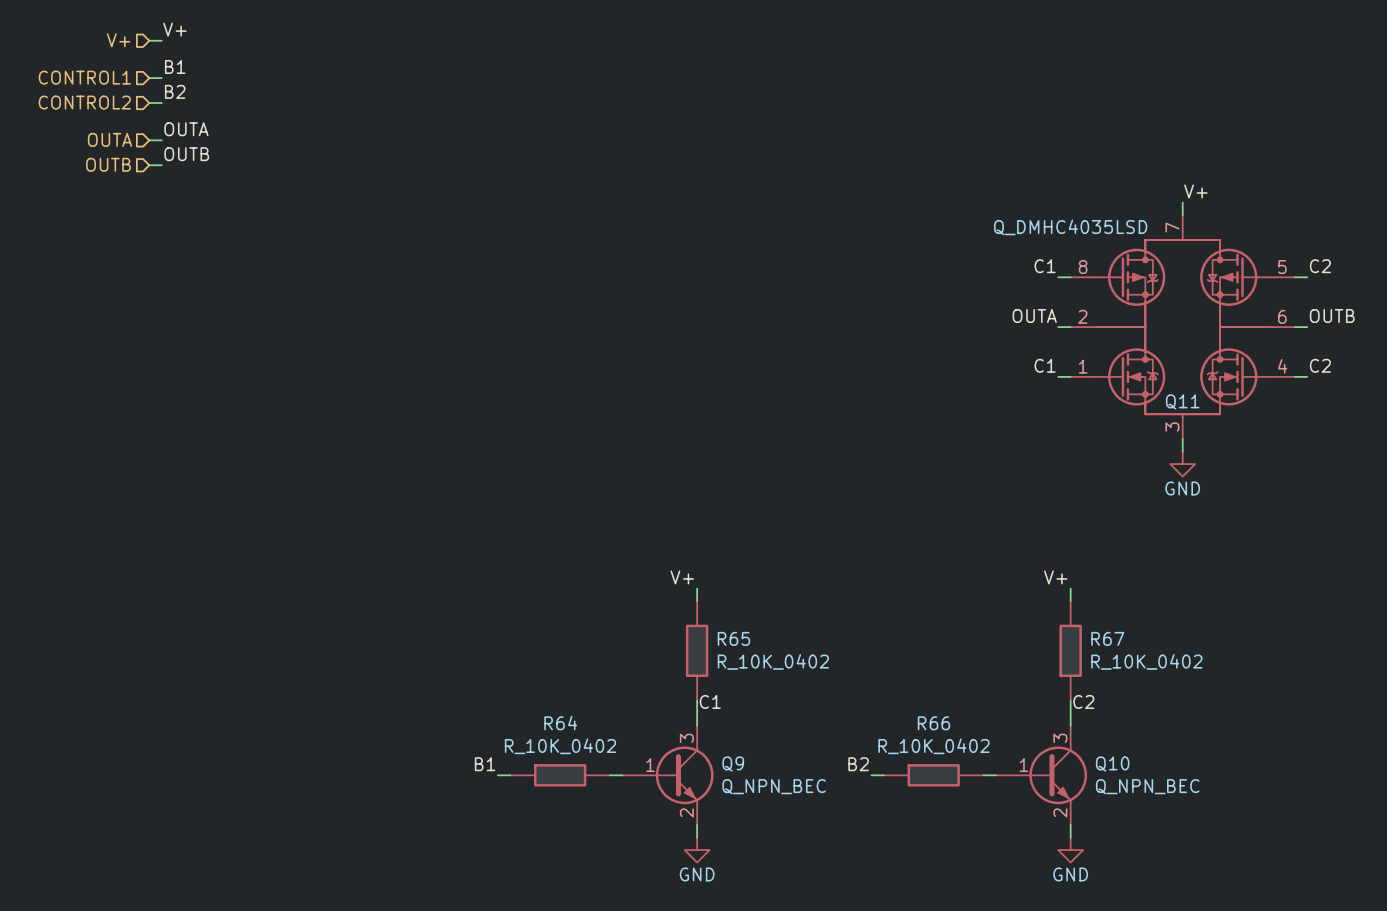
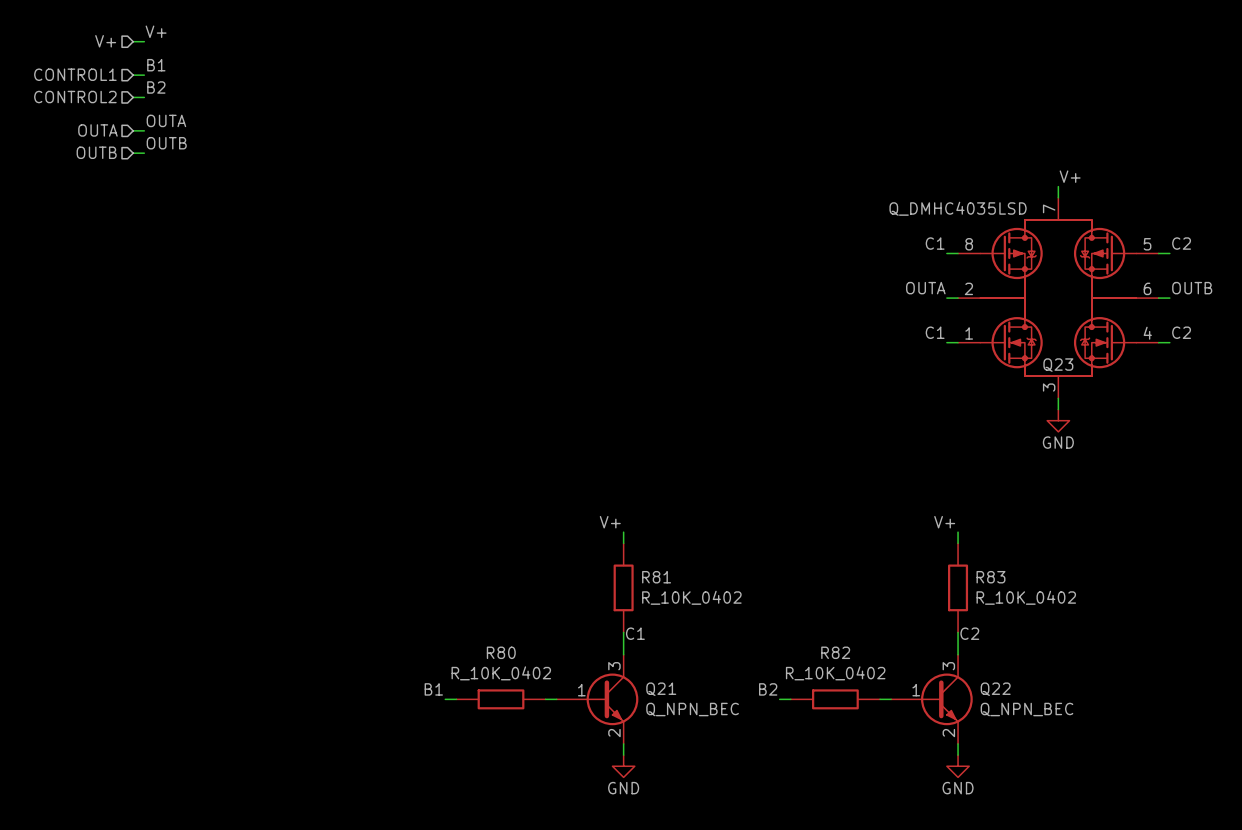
Q11 name: Q11 (1182, 401) -> Q23 (1058, 365)
R65 name: R65 (733, 638) -> R81 (656, 577)
R67 name: R67 (1107, 638) -> R83 (990, 577)
R64 name: R64 (560, 723) -> R80 (501, 652)
R66 name: R66 (934, 723) -> R82 (835, 652)
Q9 name: Q9 (733, 764) -> Q21 (661, 689)
Q10 name: Q10 (1112, 764) -> Q22 (995, 689)

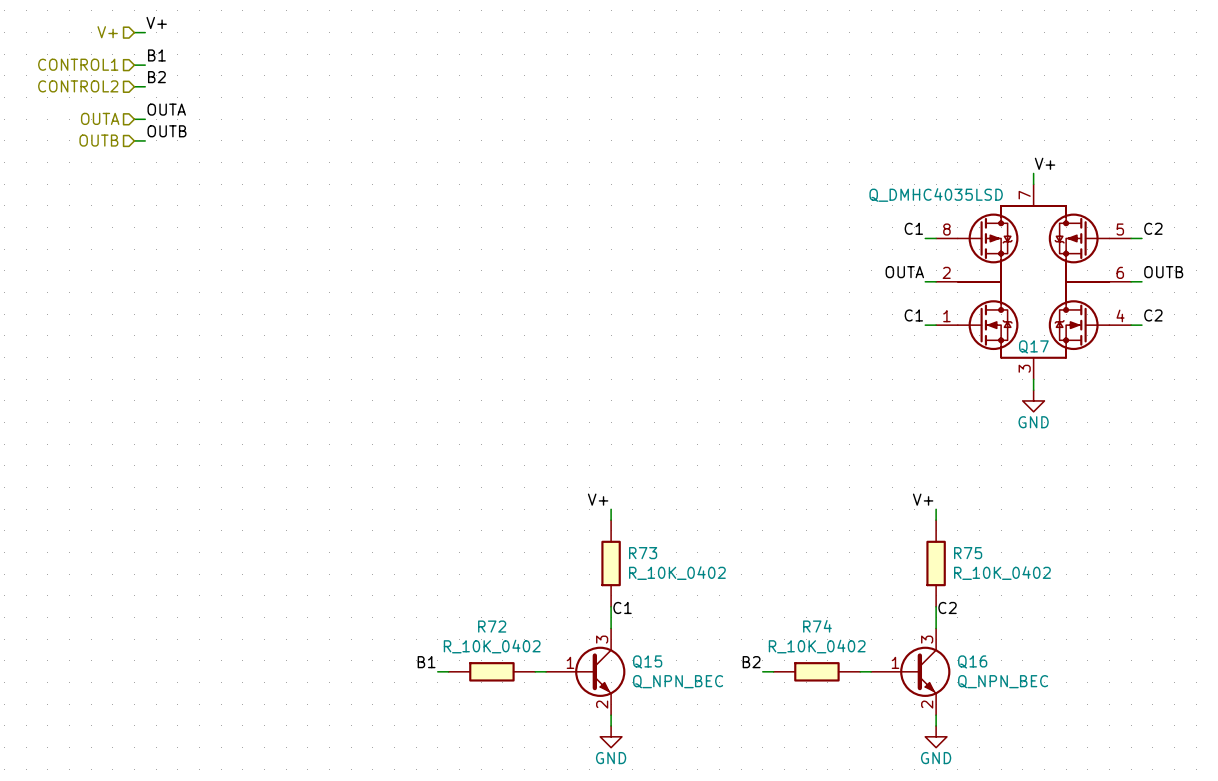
Q23 name: Q23 (1058, 365) -> Q17 (1033, 346)
R81 name: R81 (656, 577) -> R73 (643, 553)
R83 name: R83 (990, 577) -> R75 (968, 553)
R80 name: R80 (501, 652) -> R72 (492, 626)
R82 name: R82 (835, 652) -> R74 (817, 626)
Q21 name: Q21 (661, 689) -> Q15 (647, 661)
Q22 name: Q22 (995, 689) -> Q16 (972, 661)

